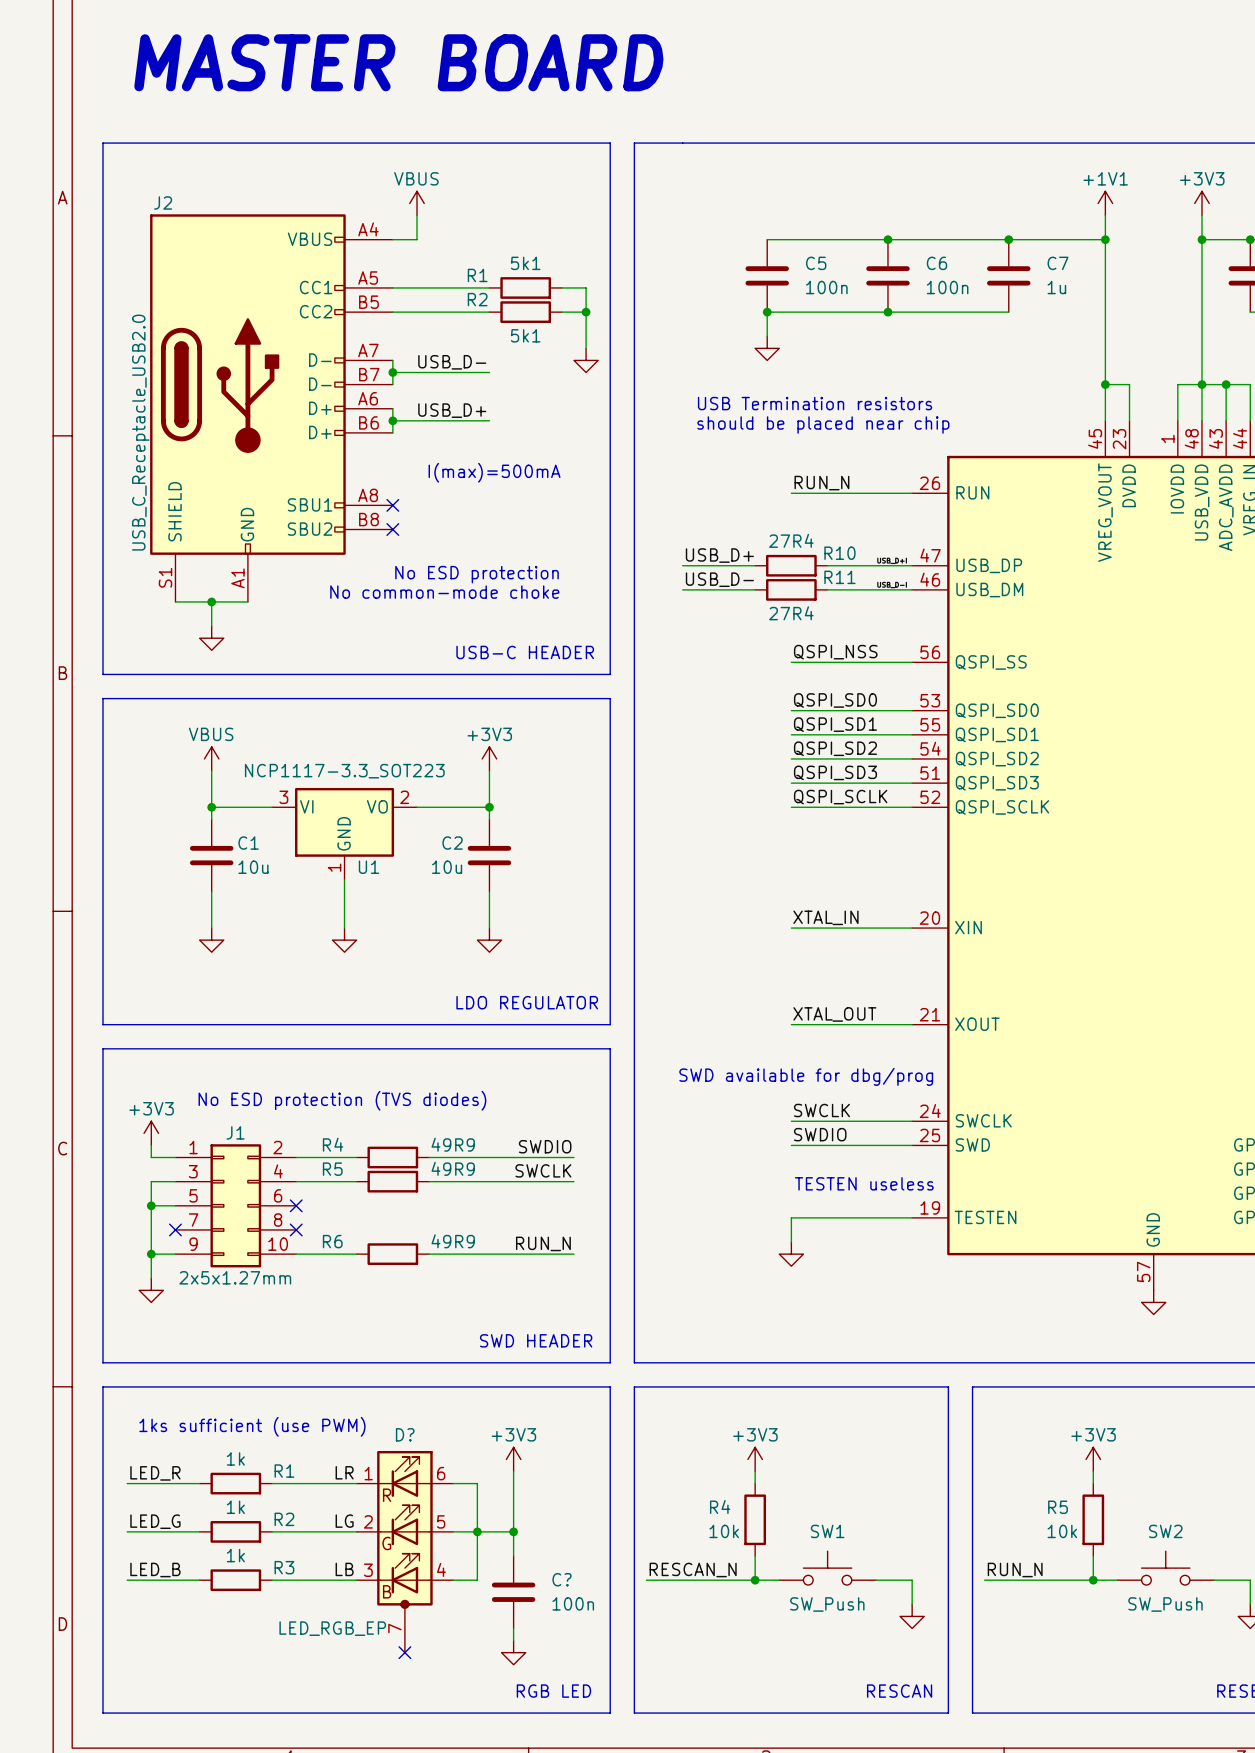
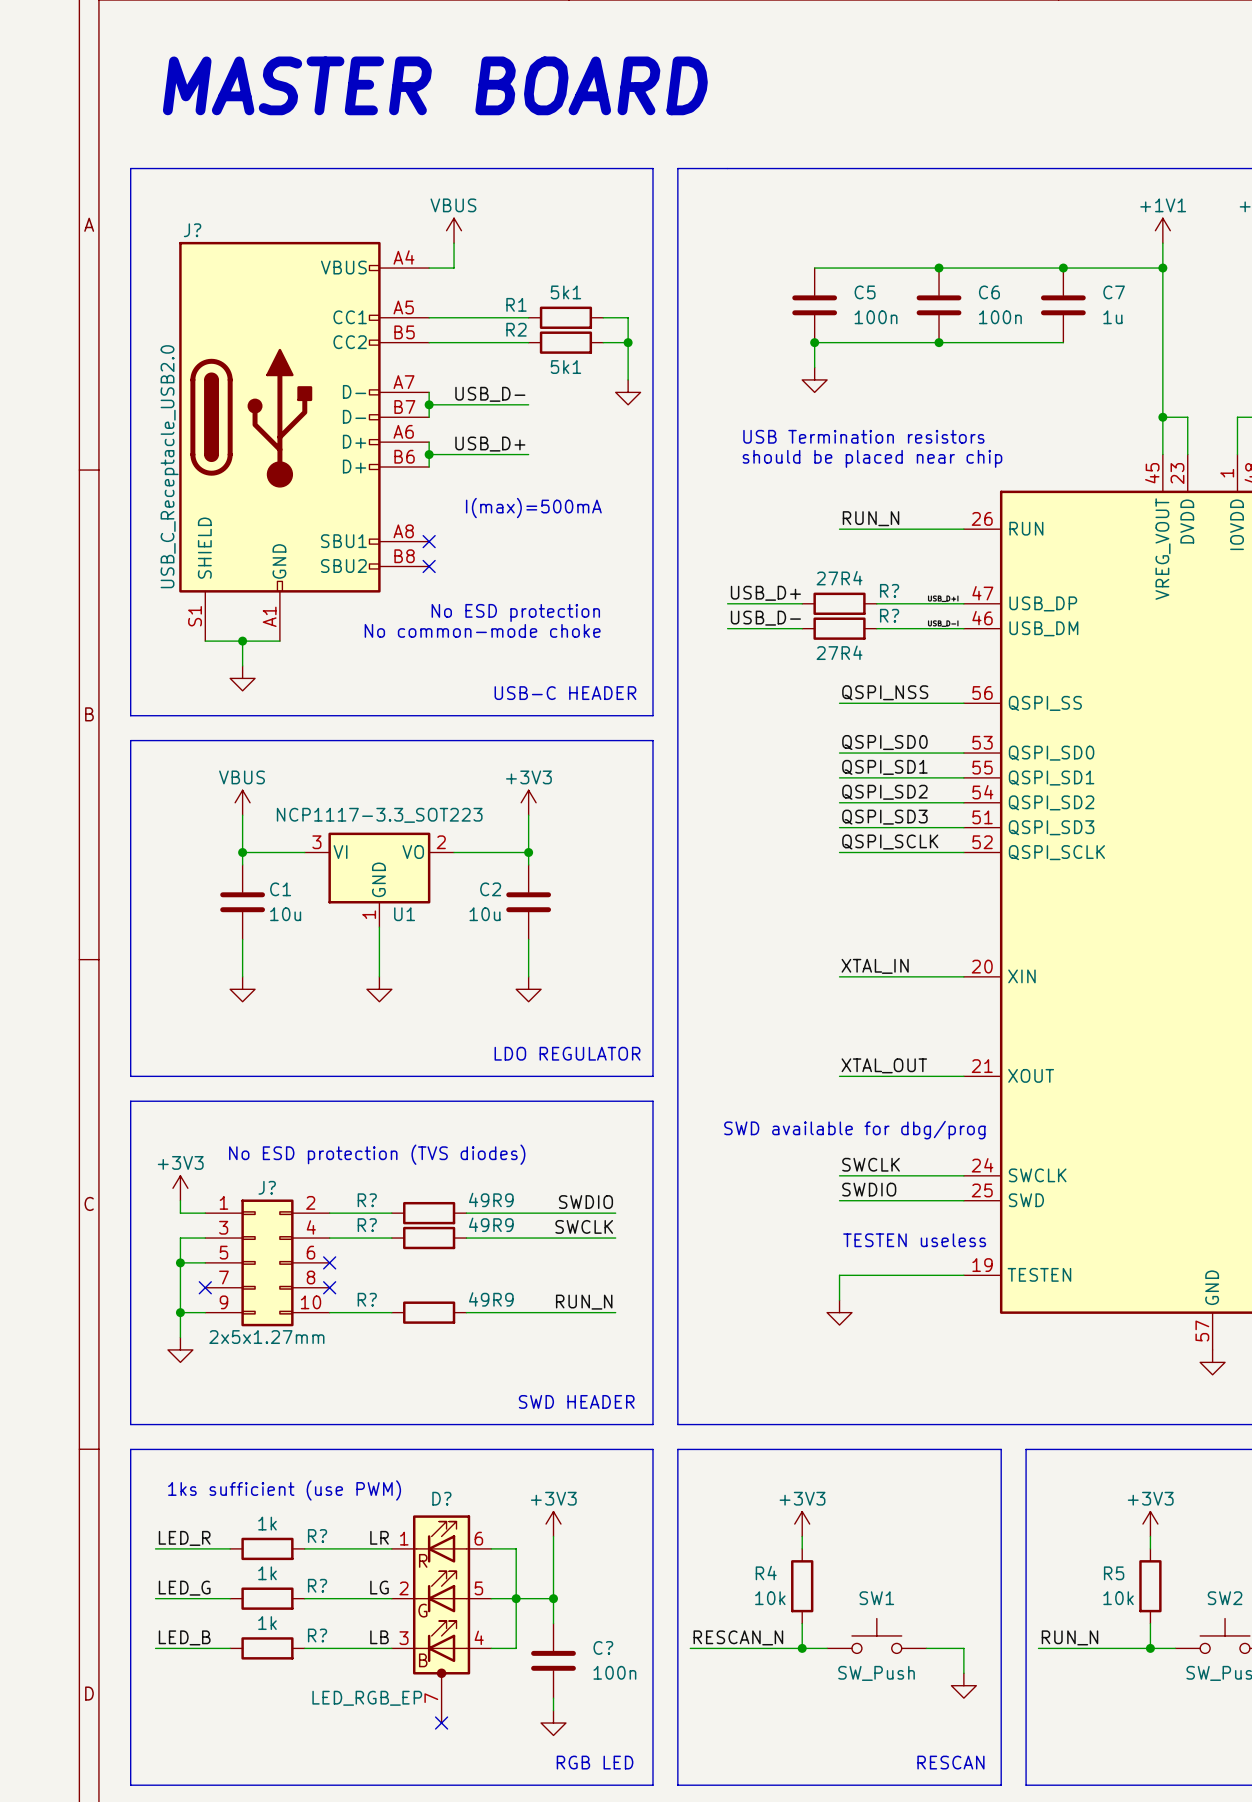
J2 name: J2 (163, 202) -> J? (192, 230)
R10 name: R10 (839, 553) -> R? (889, 590)
R11 name: R11 (839, 577) -> R? (889, 615)
J1 name: J1 (235, 1132) -> J? (267, 1187)
R4 name: R4 (333, 1144) -> R? (367, 1200)
R5 name: R5 (332, 1169) -> R? (367, 1225)
R6 name: R6 (332, 1241) -> R? (367, 1299)
R1 name: R1 (284, 1471) -> R? (317, 1536)
R2 name: R2 (284, 1519) -> R? (317, 1585)
R3 name: R3 (284, 1567) -> R? (317, 1635)

